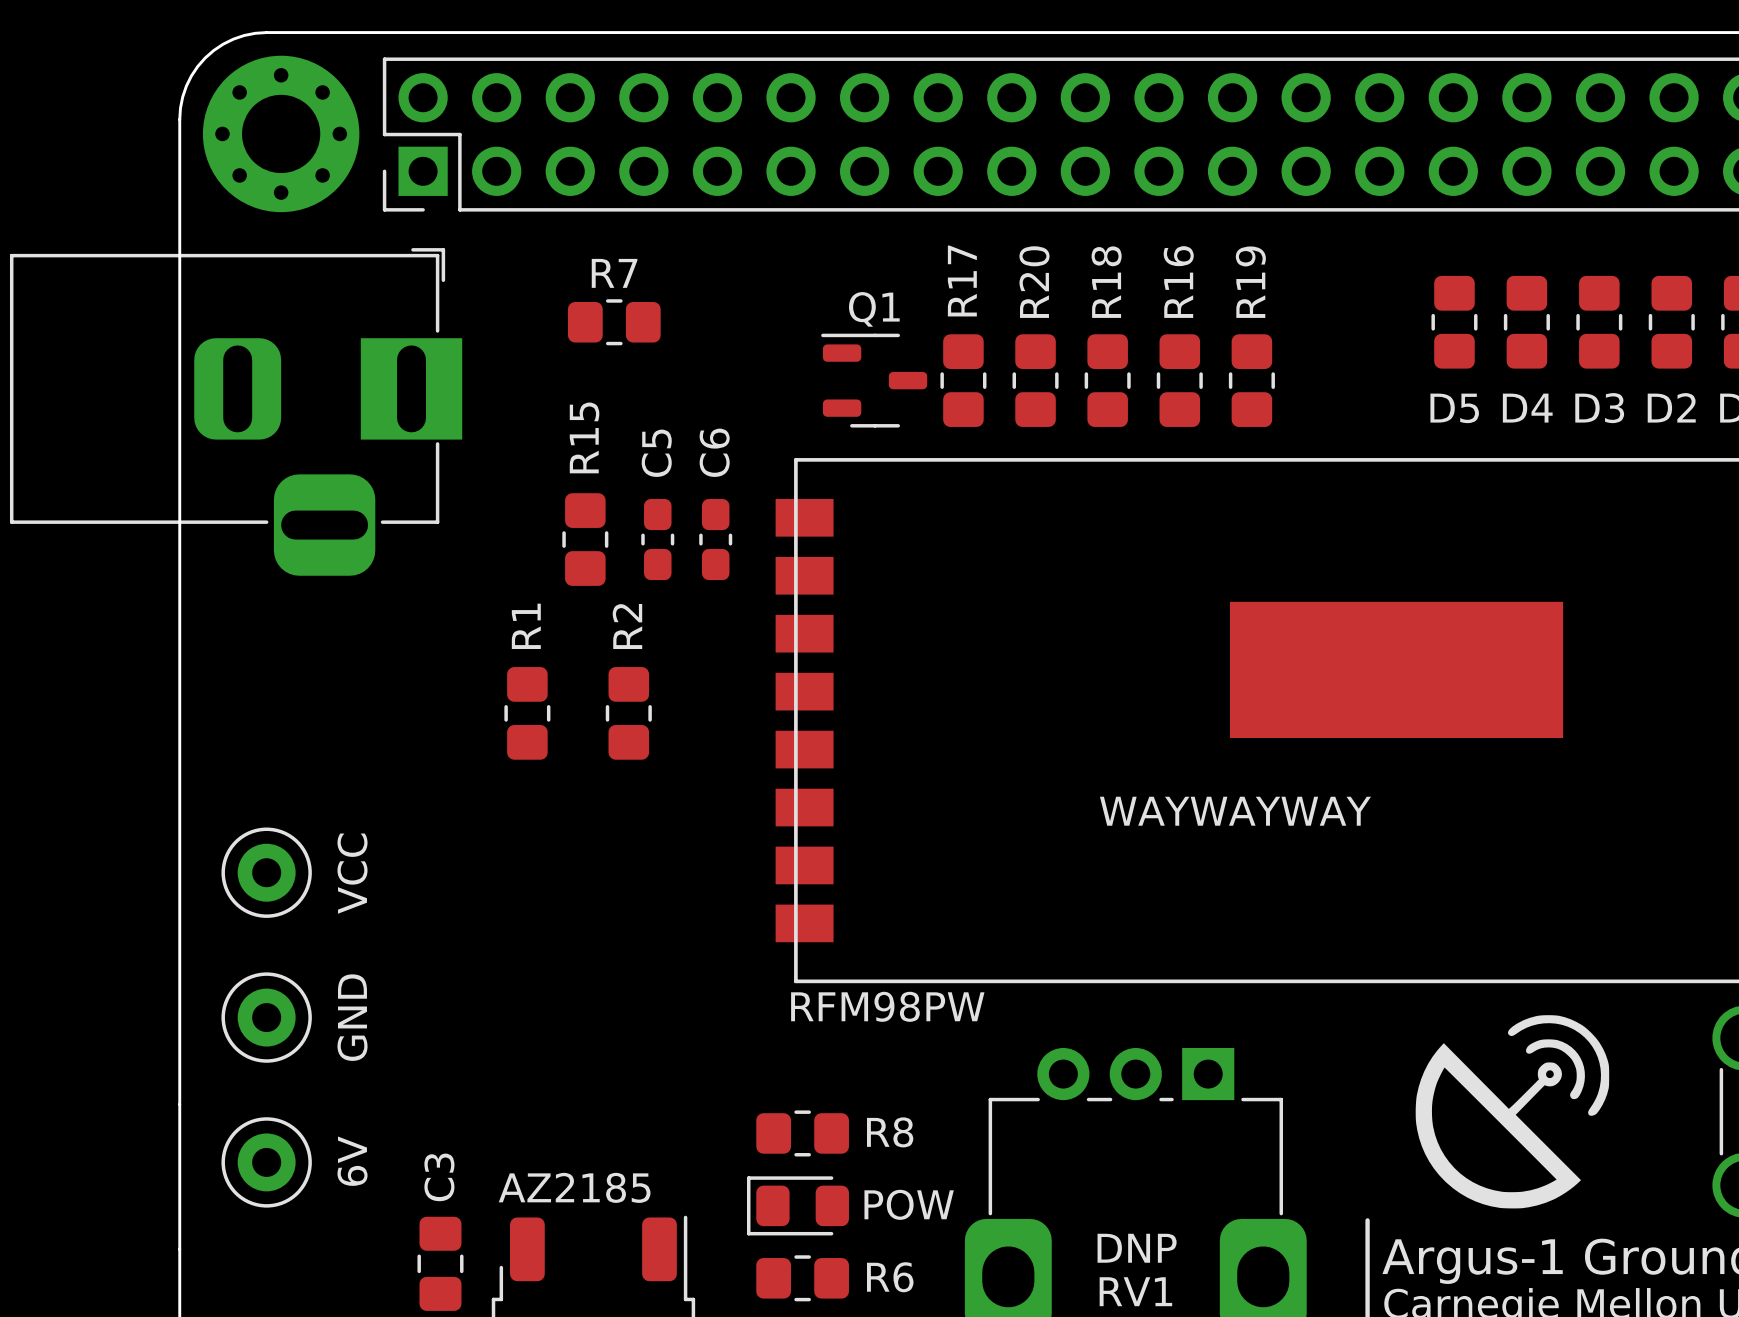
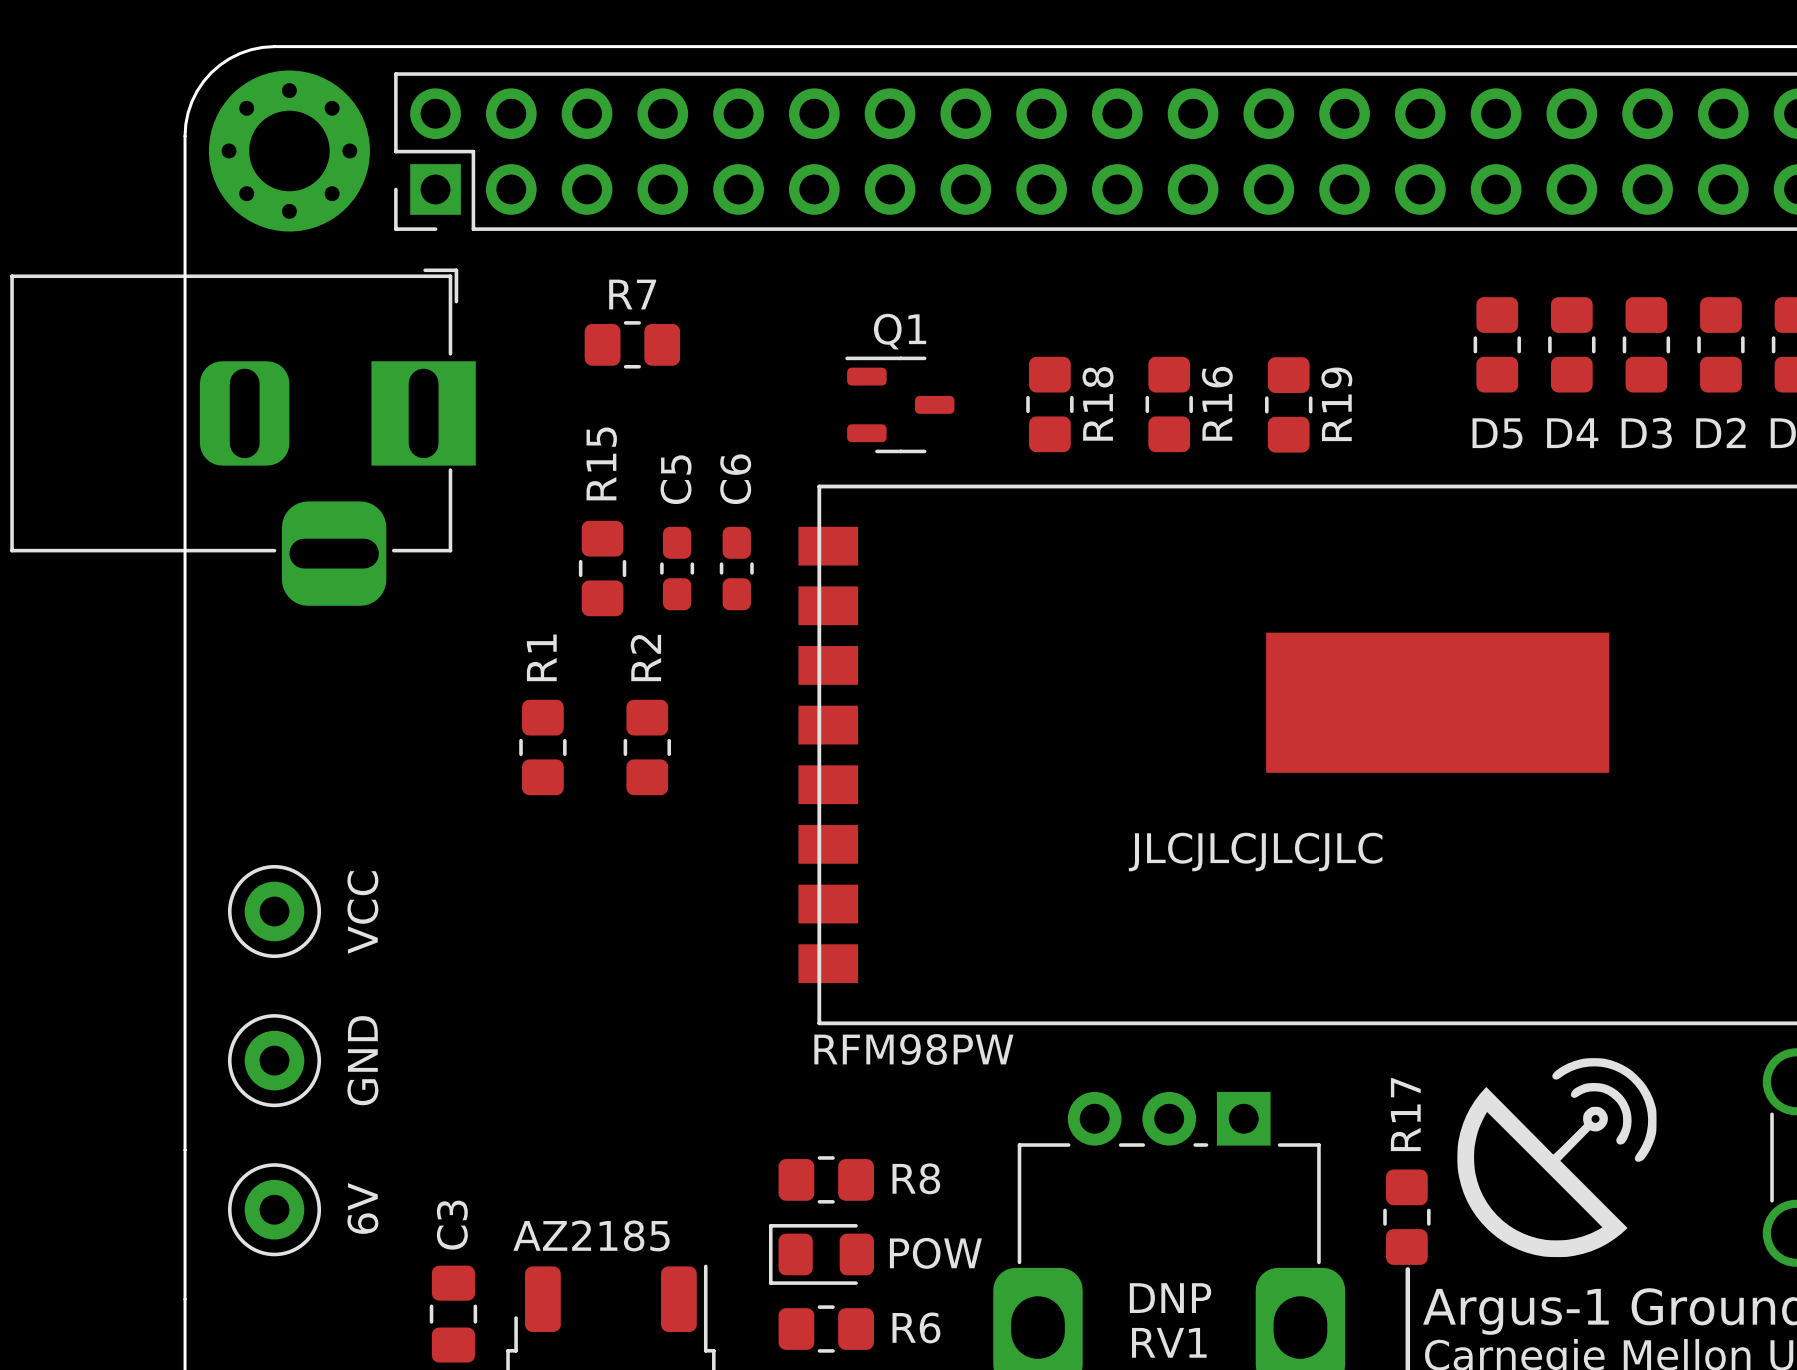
R18 name position: R18 (1106, 282) -> R18 (1098, 403)
R16 name position: R16 (1178, 282) -> R16 (1217, 403)
R19 name position: R19 (1250, 282) -> R19 (1336, 404)
R17 position: (963, 380) -> (1406, 1217)
R20: (1035, 380) -> none
R18 position: (1107, 380) -> (1049, 404)
R16 position: (1179, 380) -> (1169, 404)
text: WAYWAYWAY (1235, 811) -> JLCJLCJLCJLC (1255, 852)

